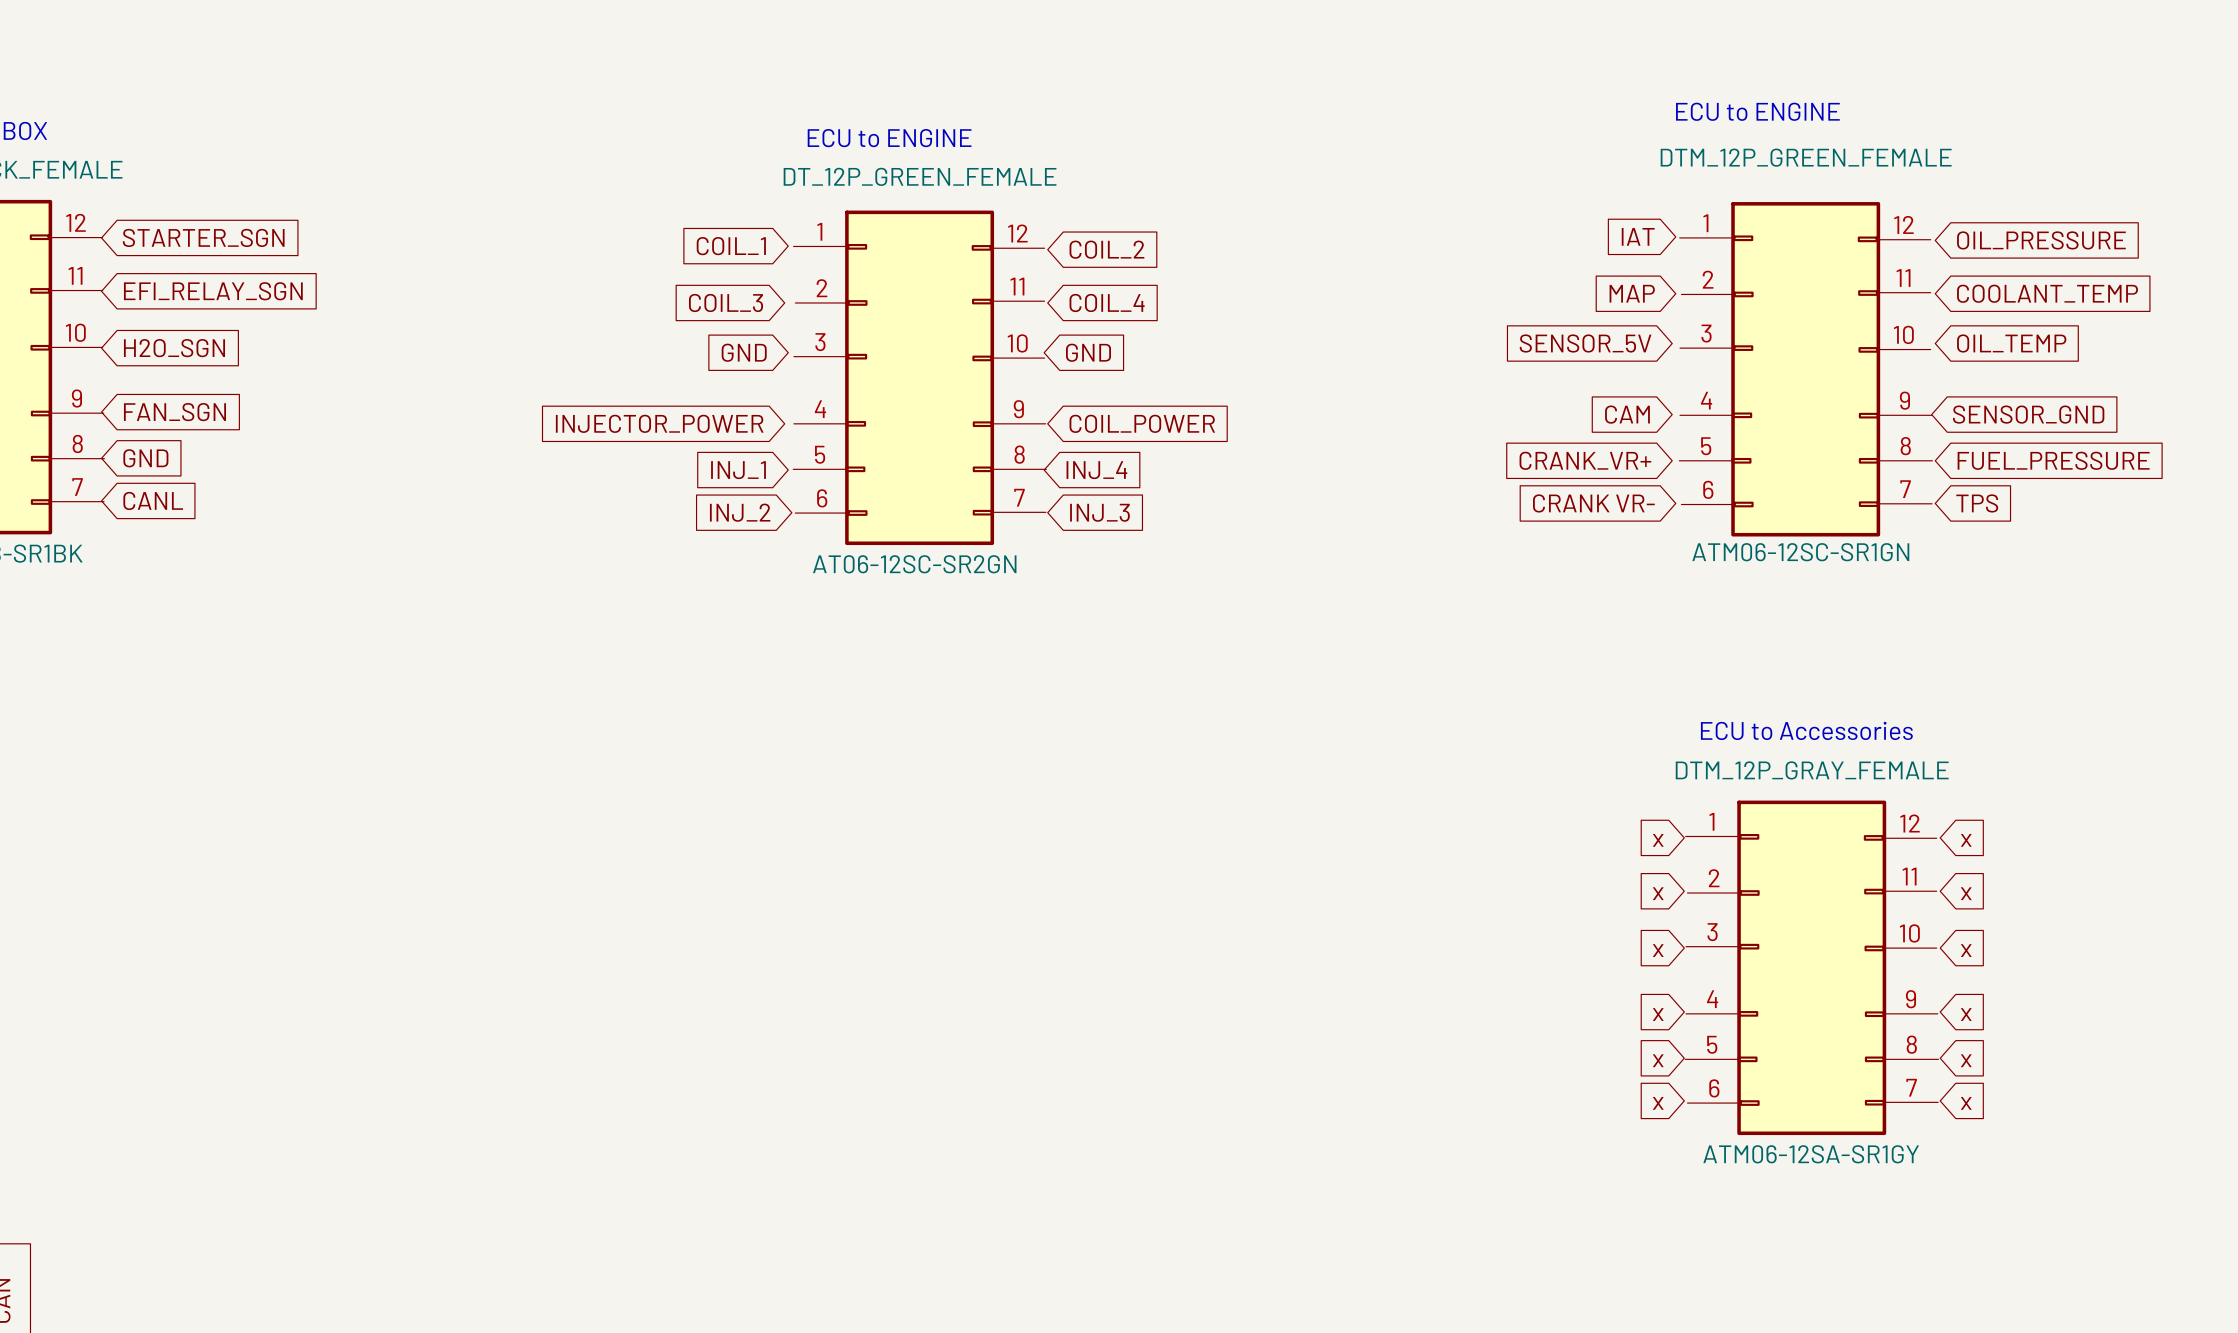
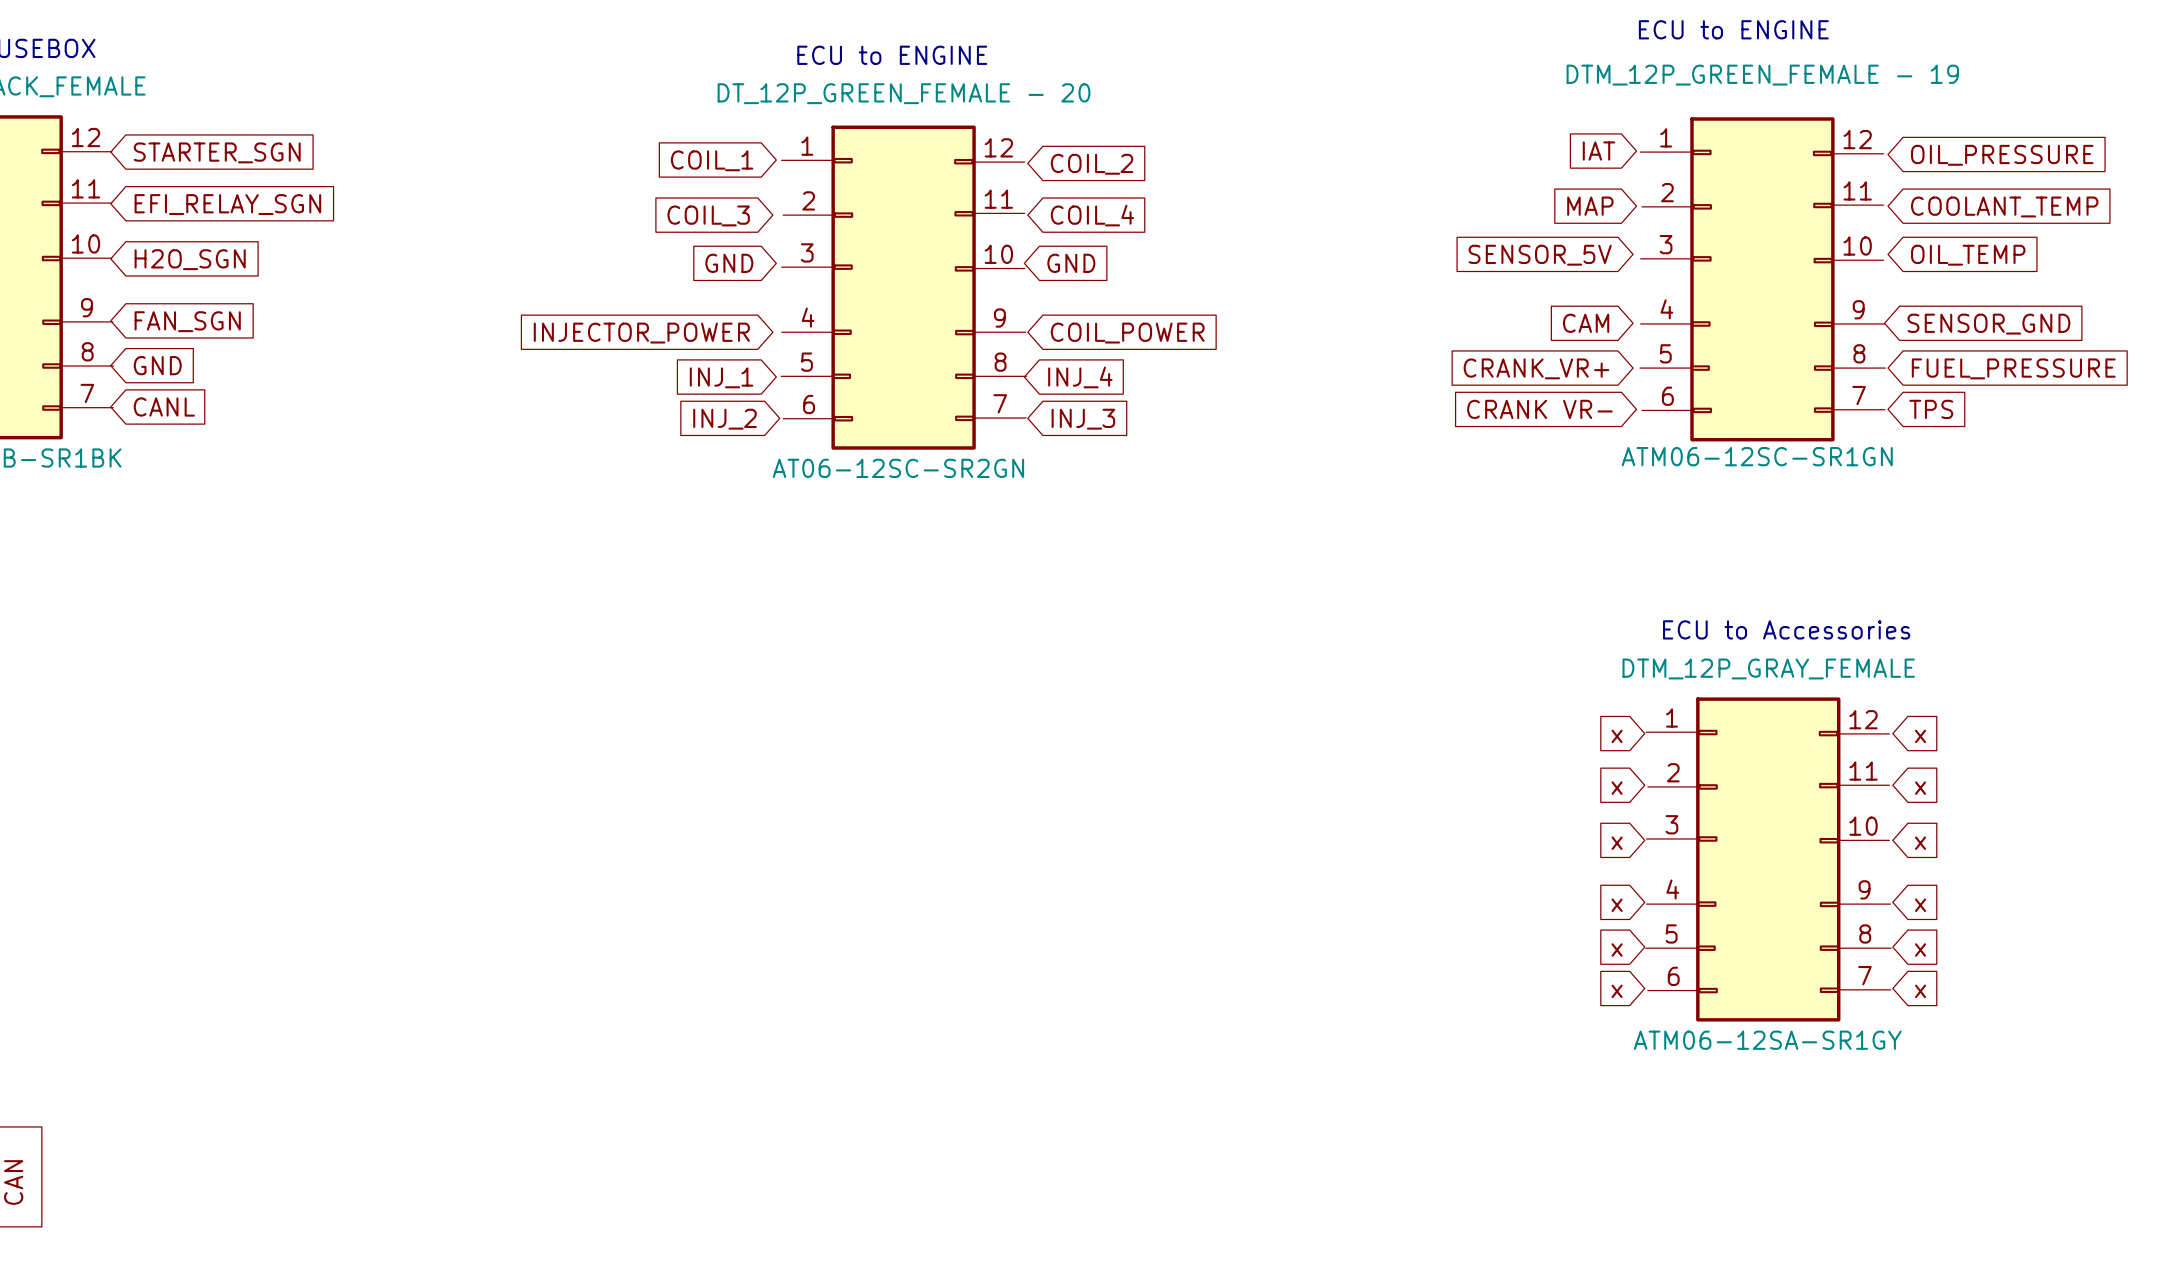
part value: DTM_12P_GREEN_FEMALE (1806, 157) -> DTM_12P_GREEN_FEMALE - 19 (1762, 75)
part value: DT_12P_GREEN_FEMALE (920, 176) -> DT_12P_GREEN_FEMALE - 20 (904, 93)

